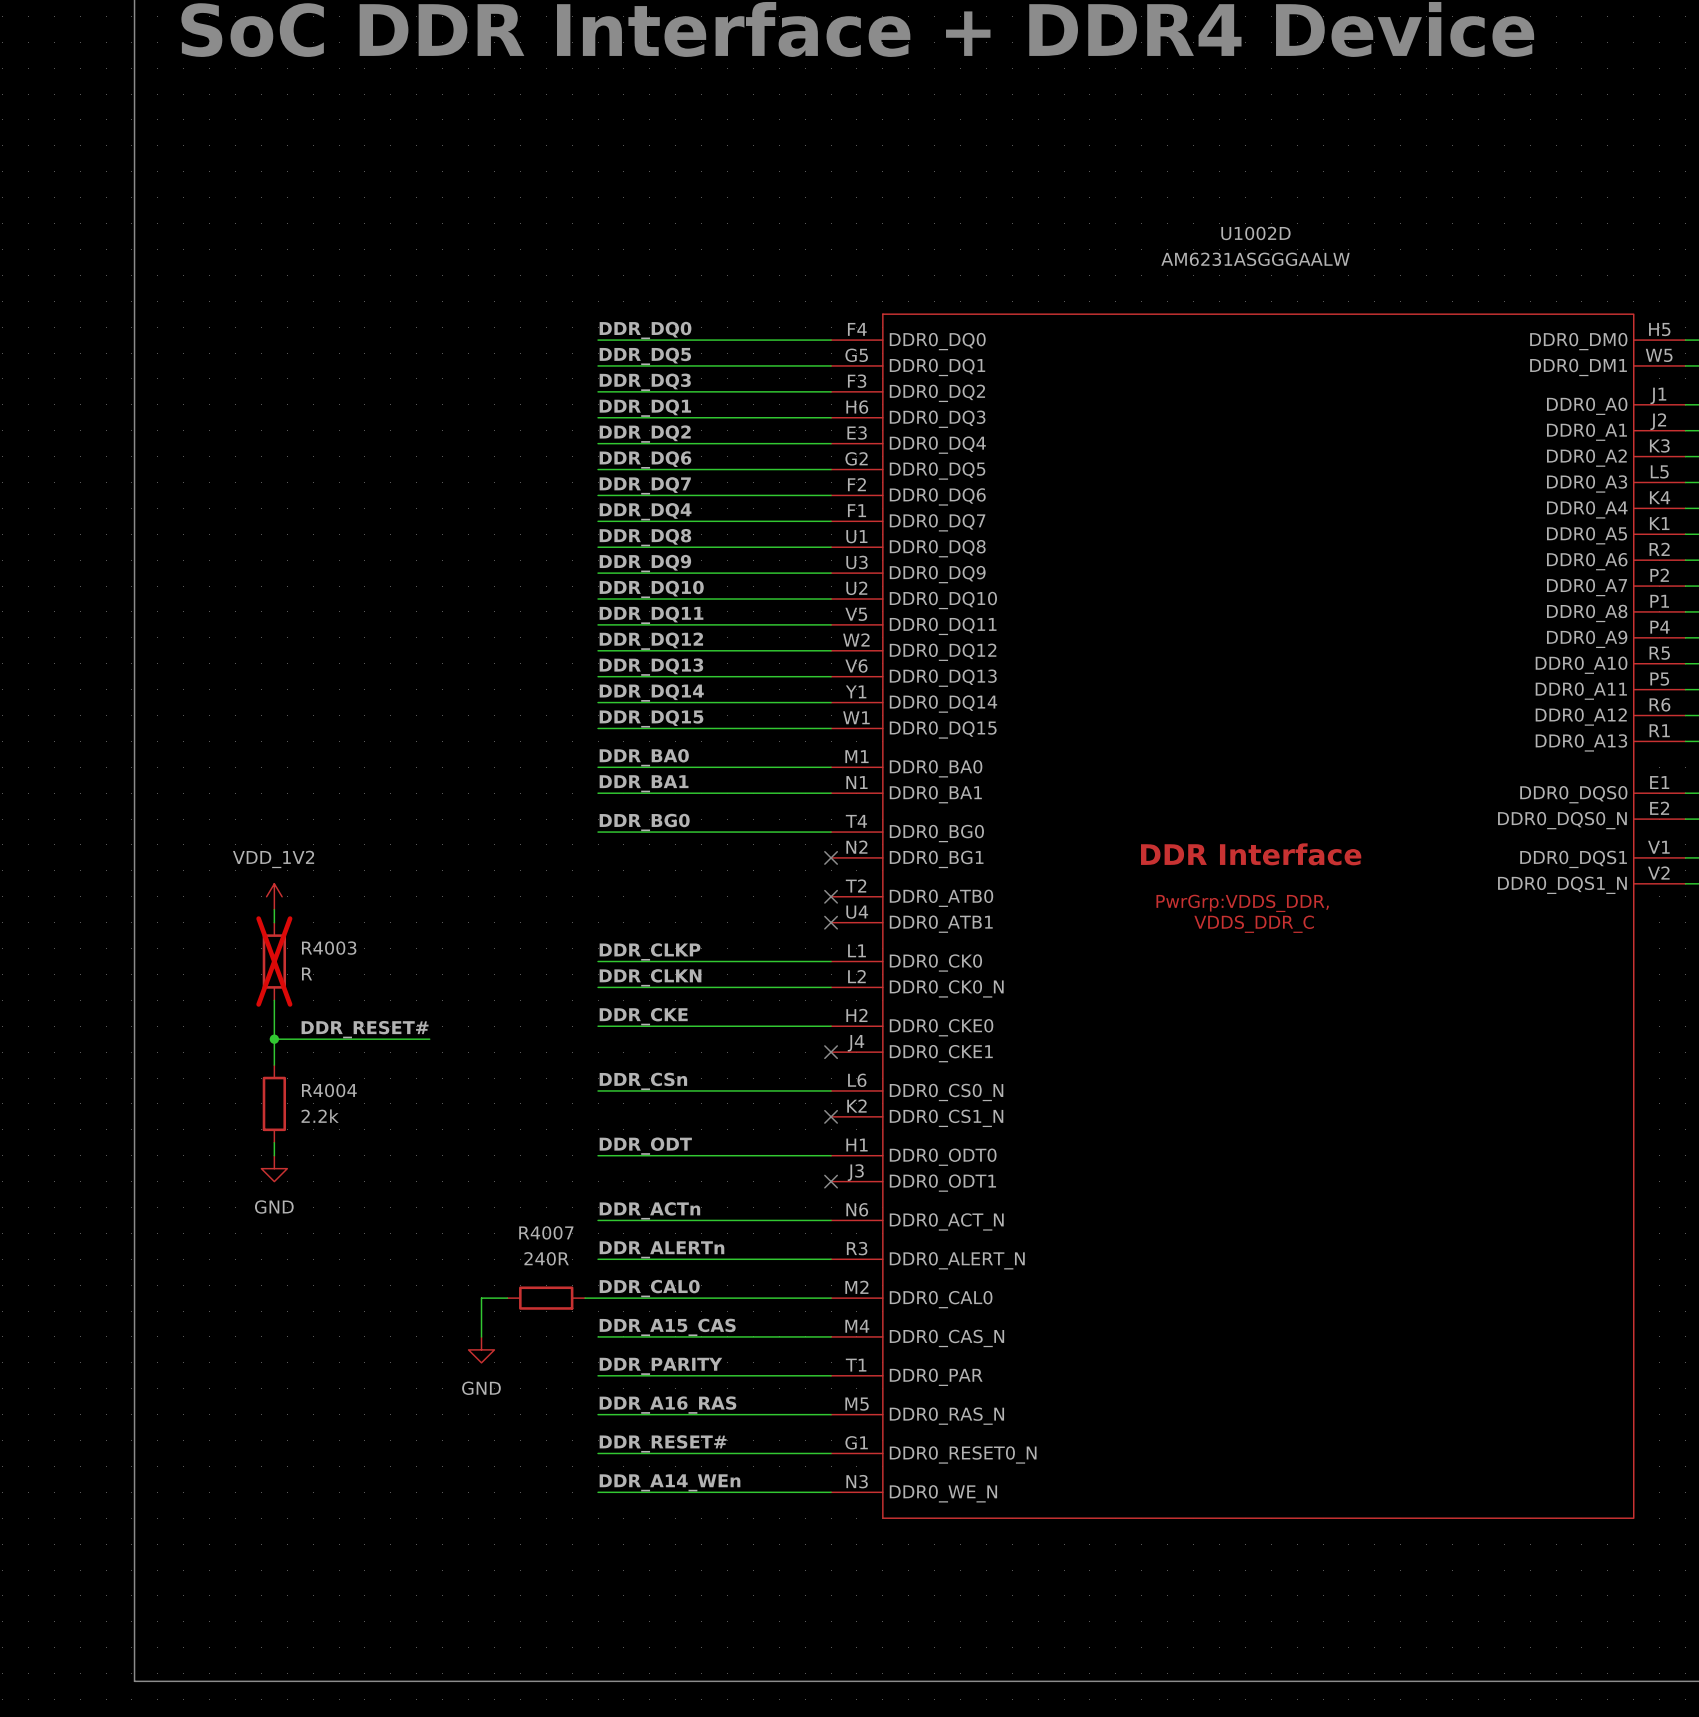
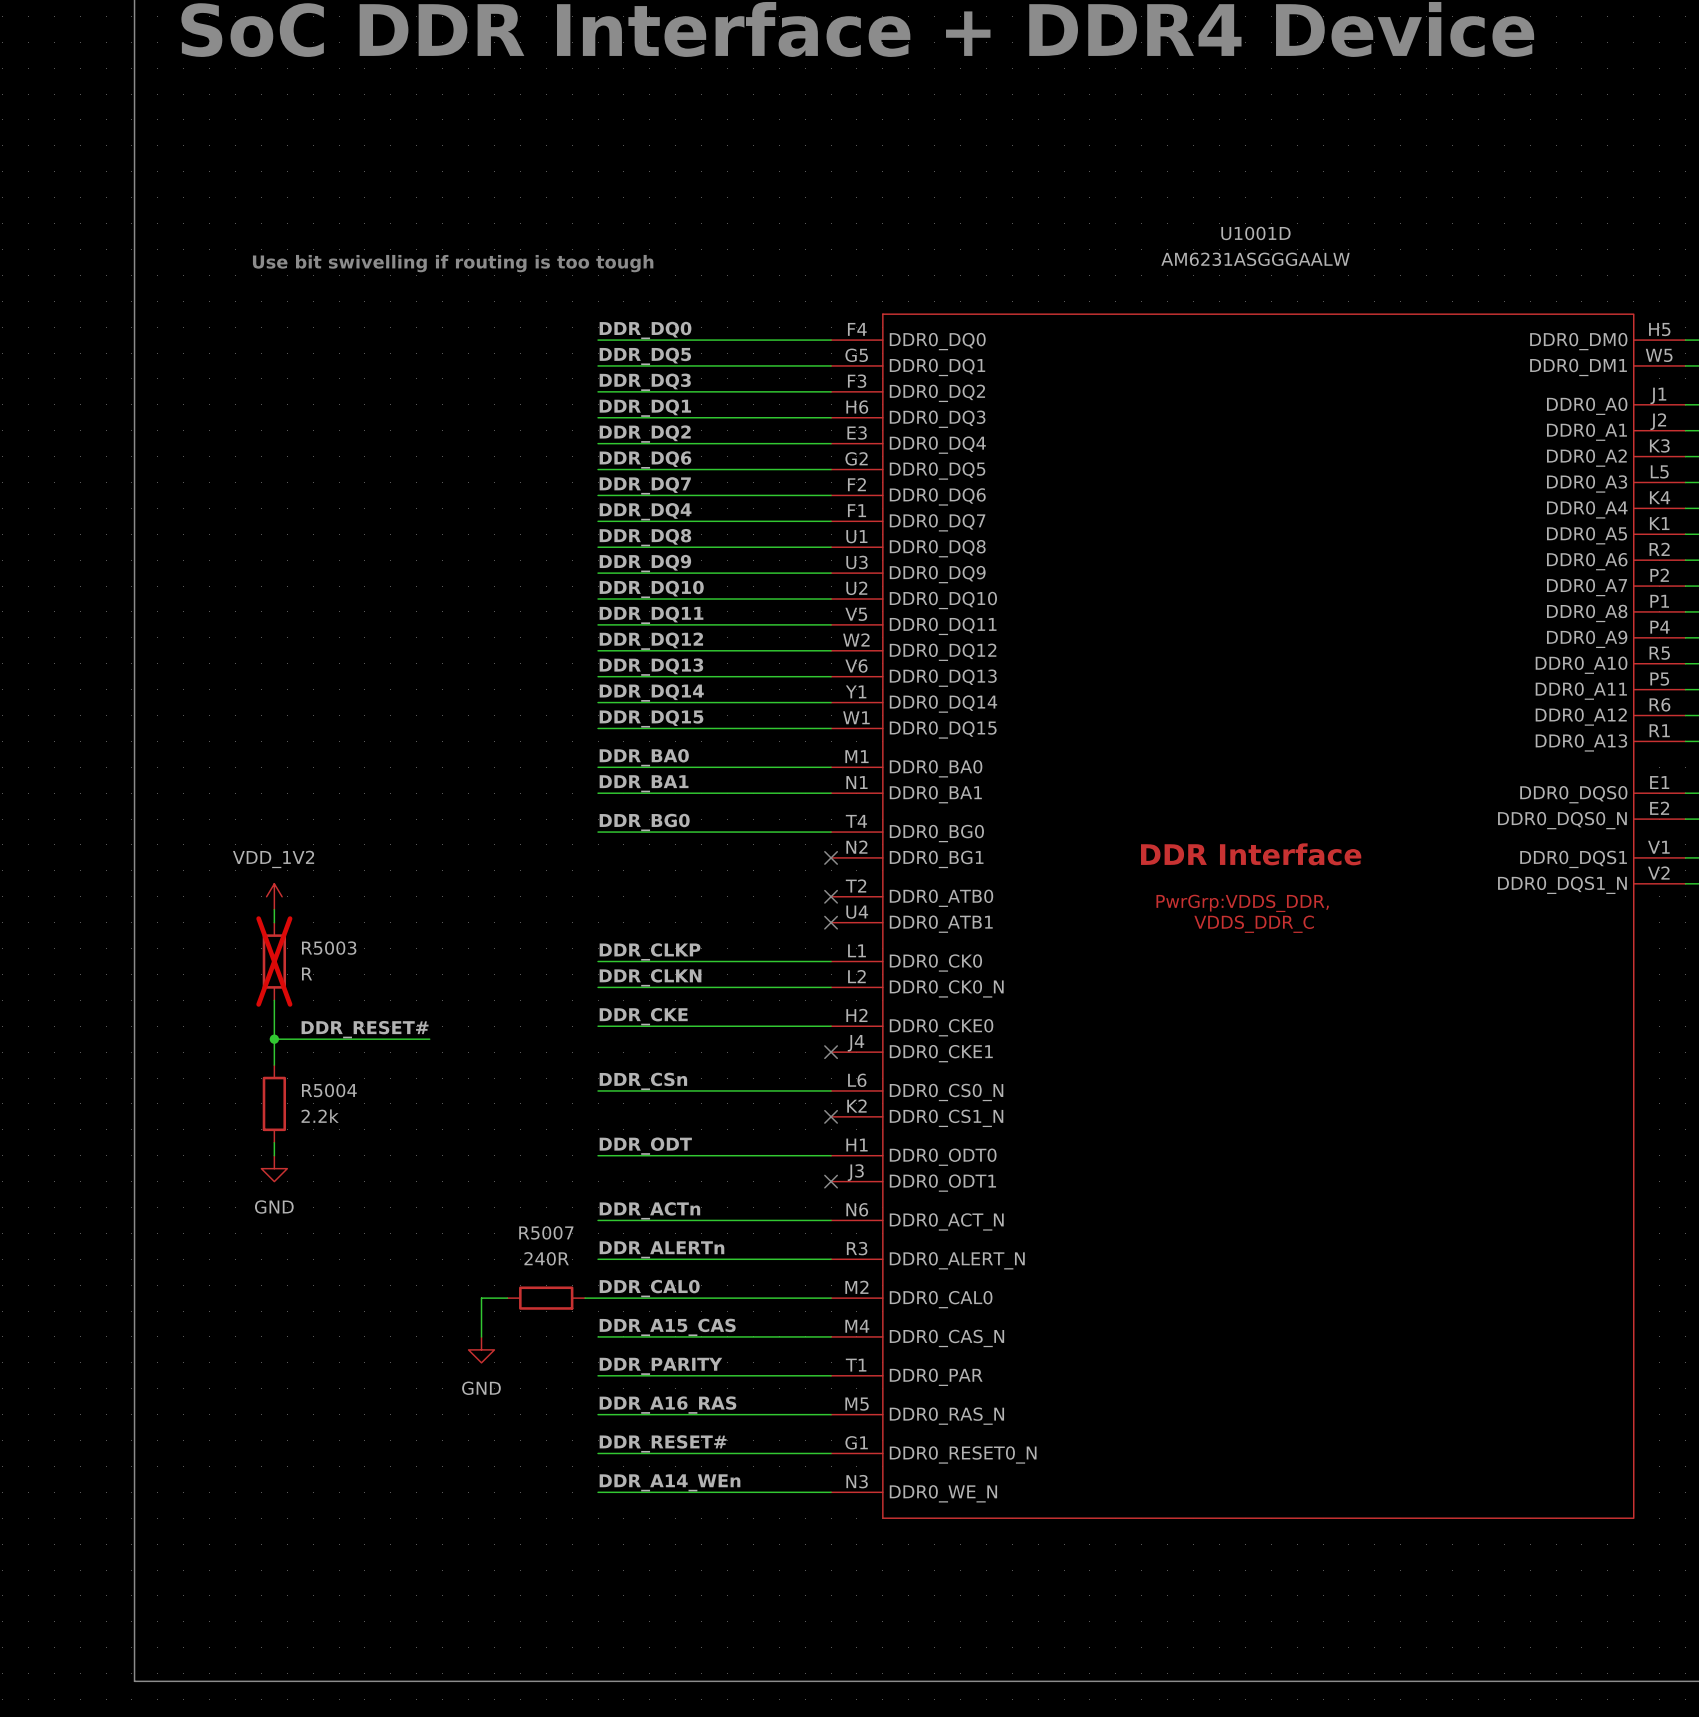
U1002D name: U1002D (1255, 233) -> U1001D (1255, 233)
text: none -> Use bit swivelling if routing is too tough (453, 263)
R4003 name: R4003 (329, 948) -> R5003 (329, 948)
R4004 name: R4004 (329, 1090) -> R5004 (329, 1090)
R4007 name: R4007 (546, 1232) -> R5007 (546, 1232)

